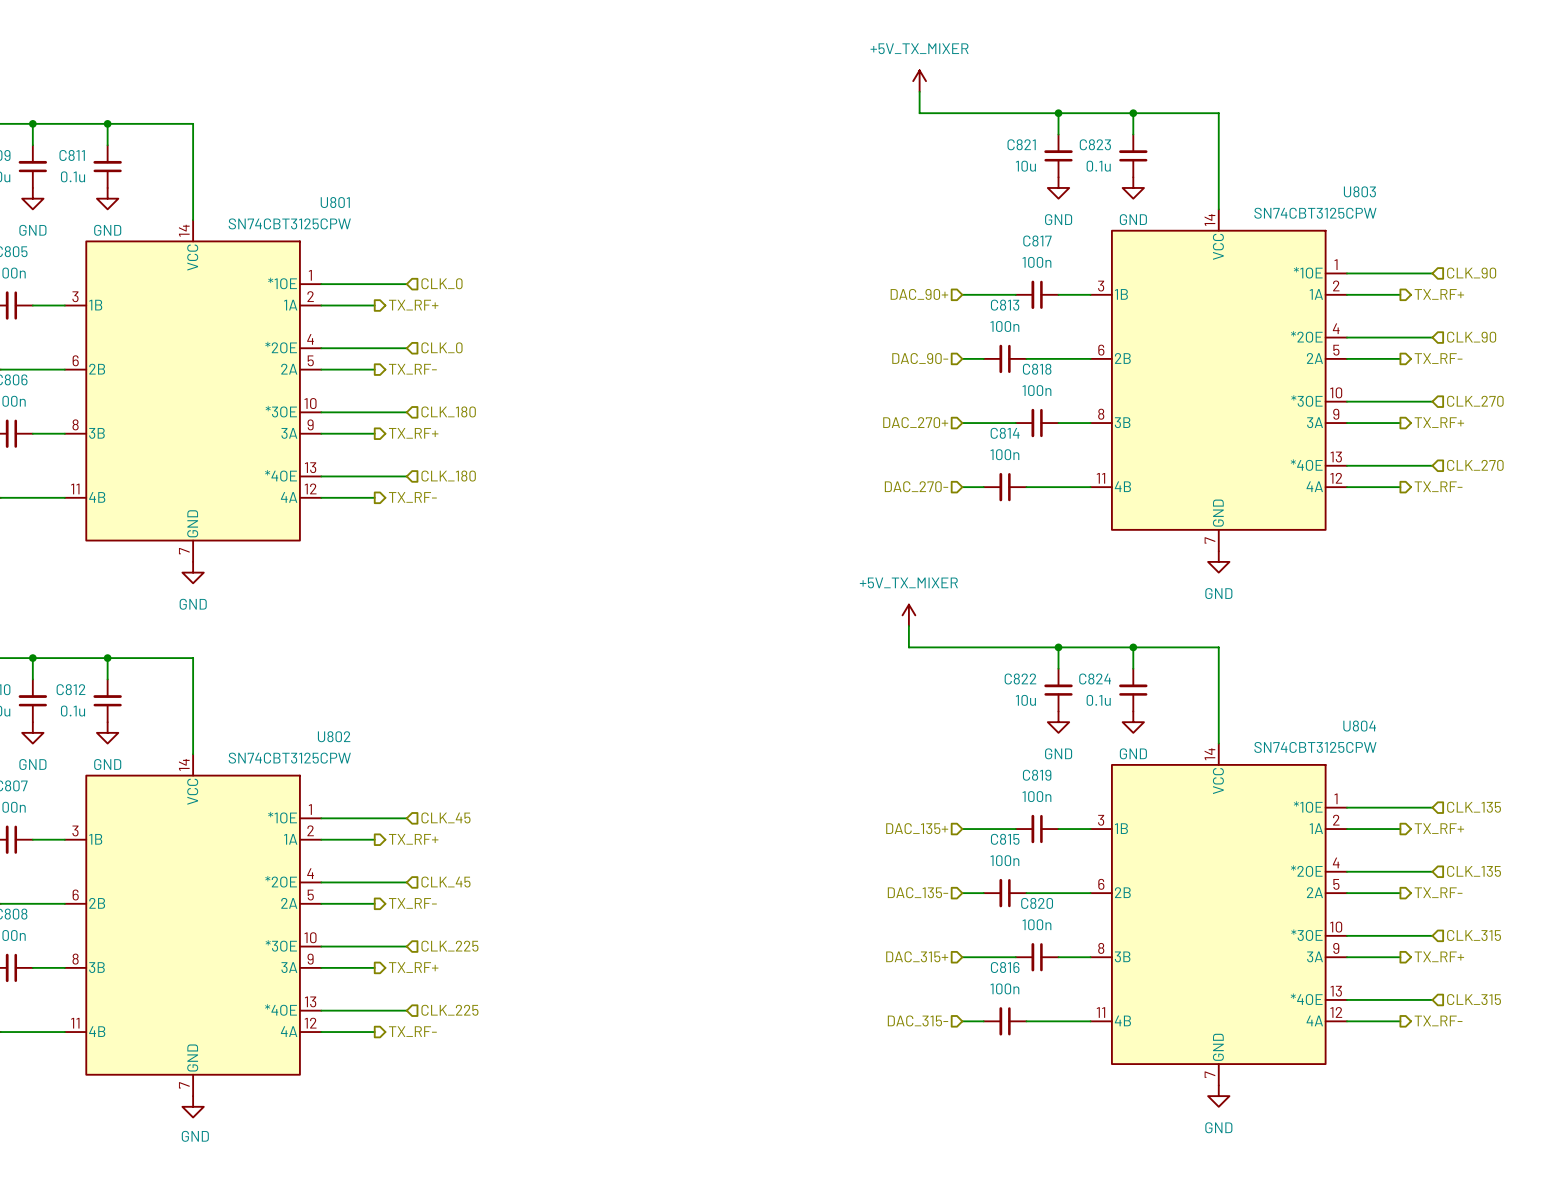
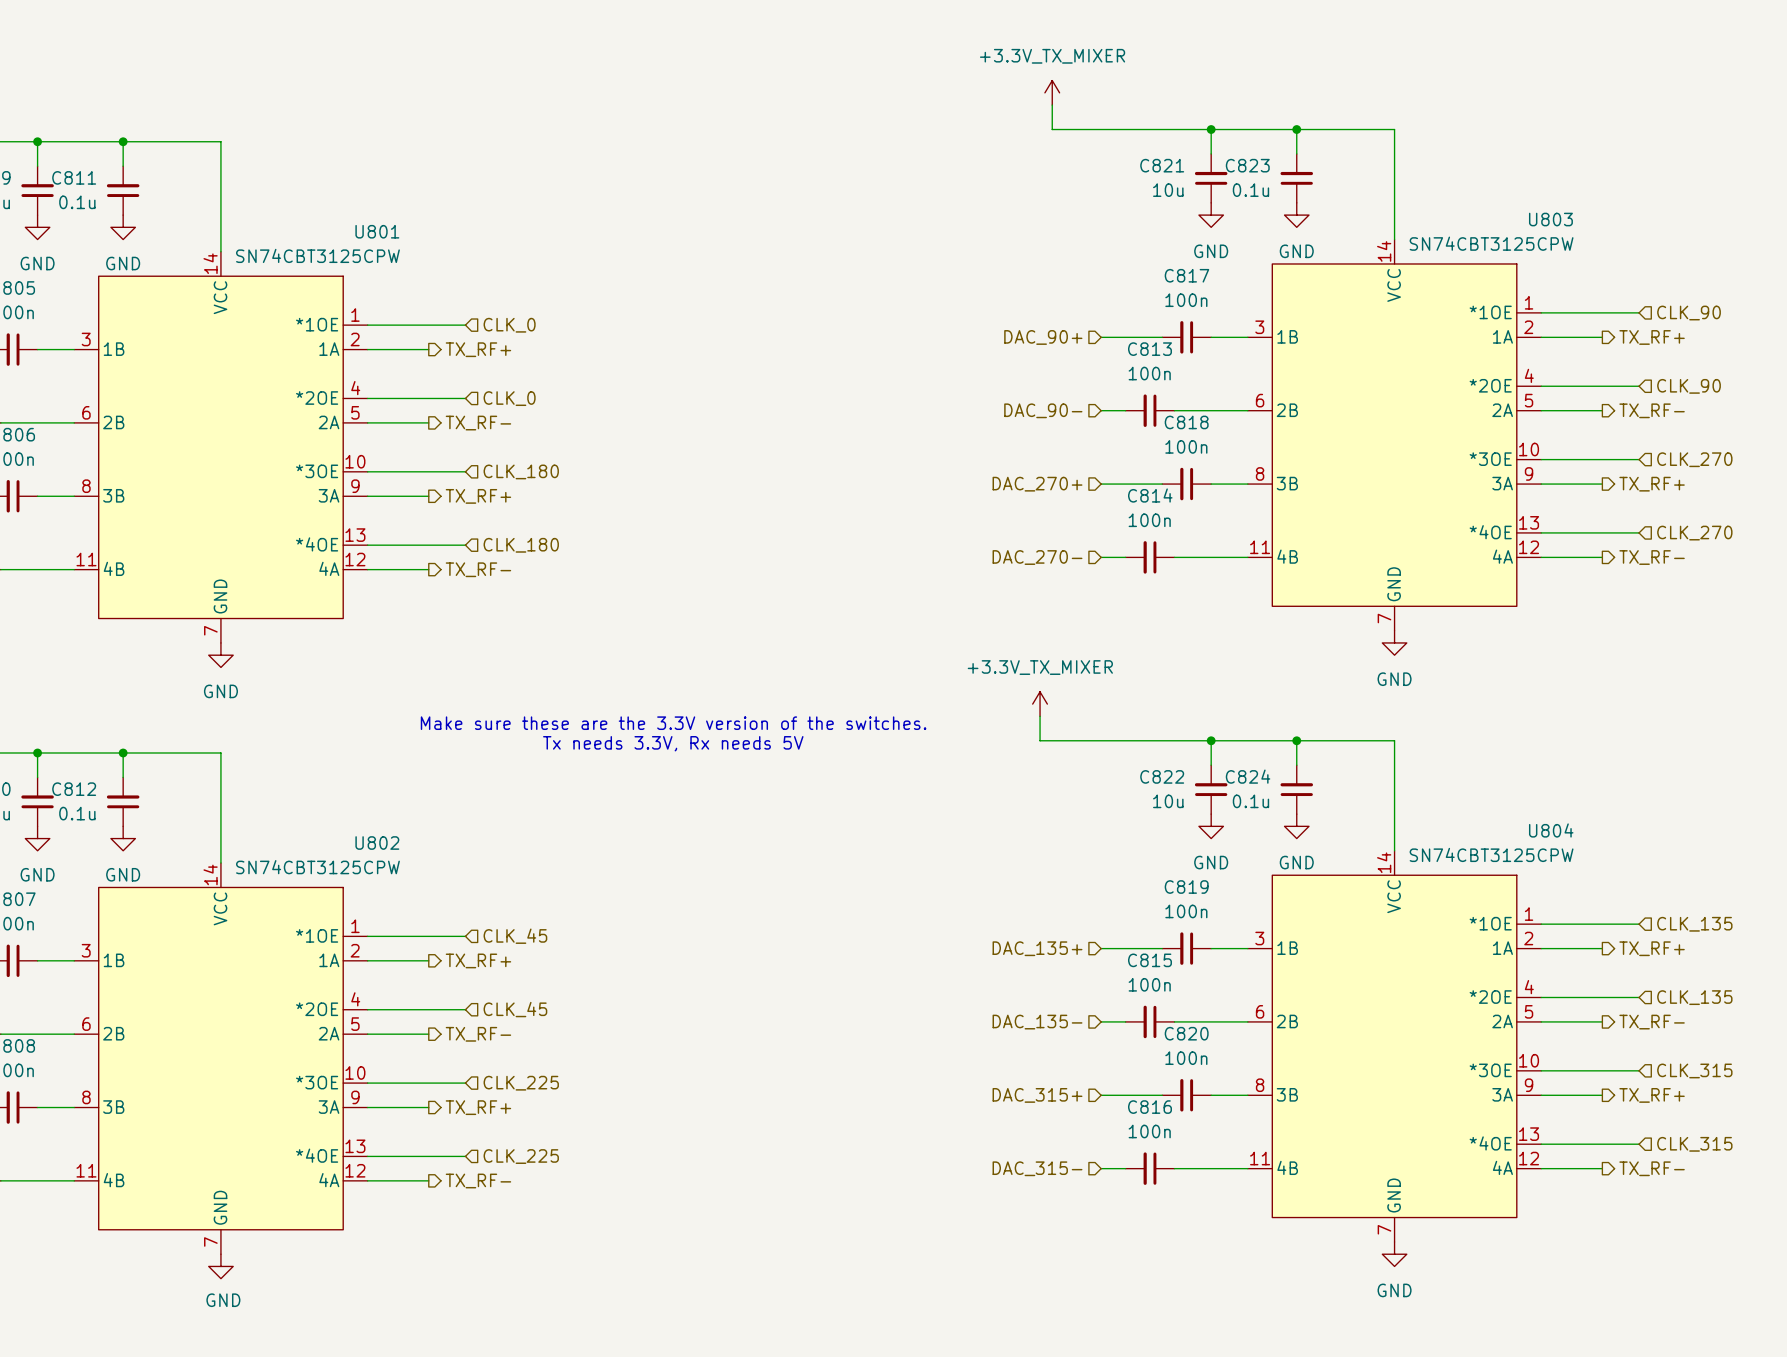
power symbol: +5V_TX_MIXER (919, 81) -> +3.3V_TX_MIXER (1052, 92)
power symbol: +5V_TX_MIXER (908, 615) -> +3.3V_TX_MIXER (1040, 704)
text: none -> Make sure these are the 3.3V version of the switches. (673, 723)
text: none -> Tx needs 3.3V, Rx needs 5V (673, 743)

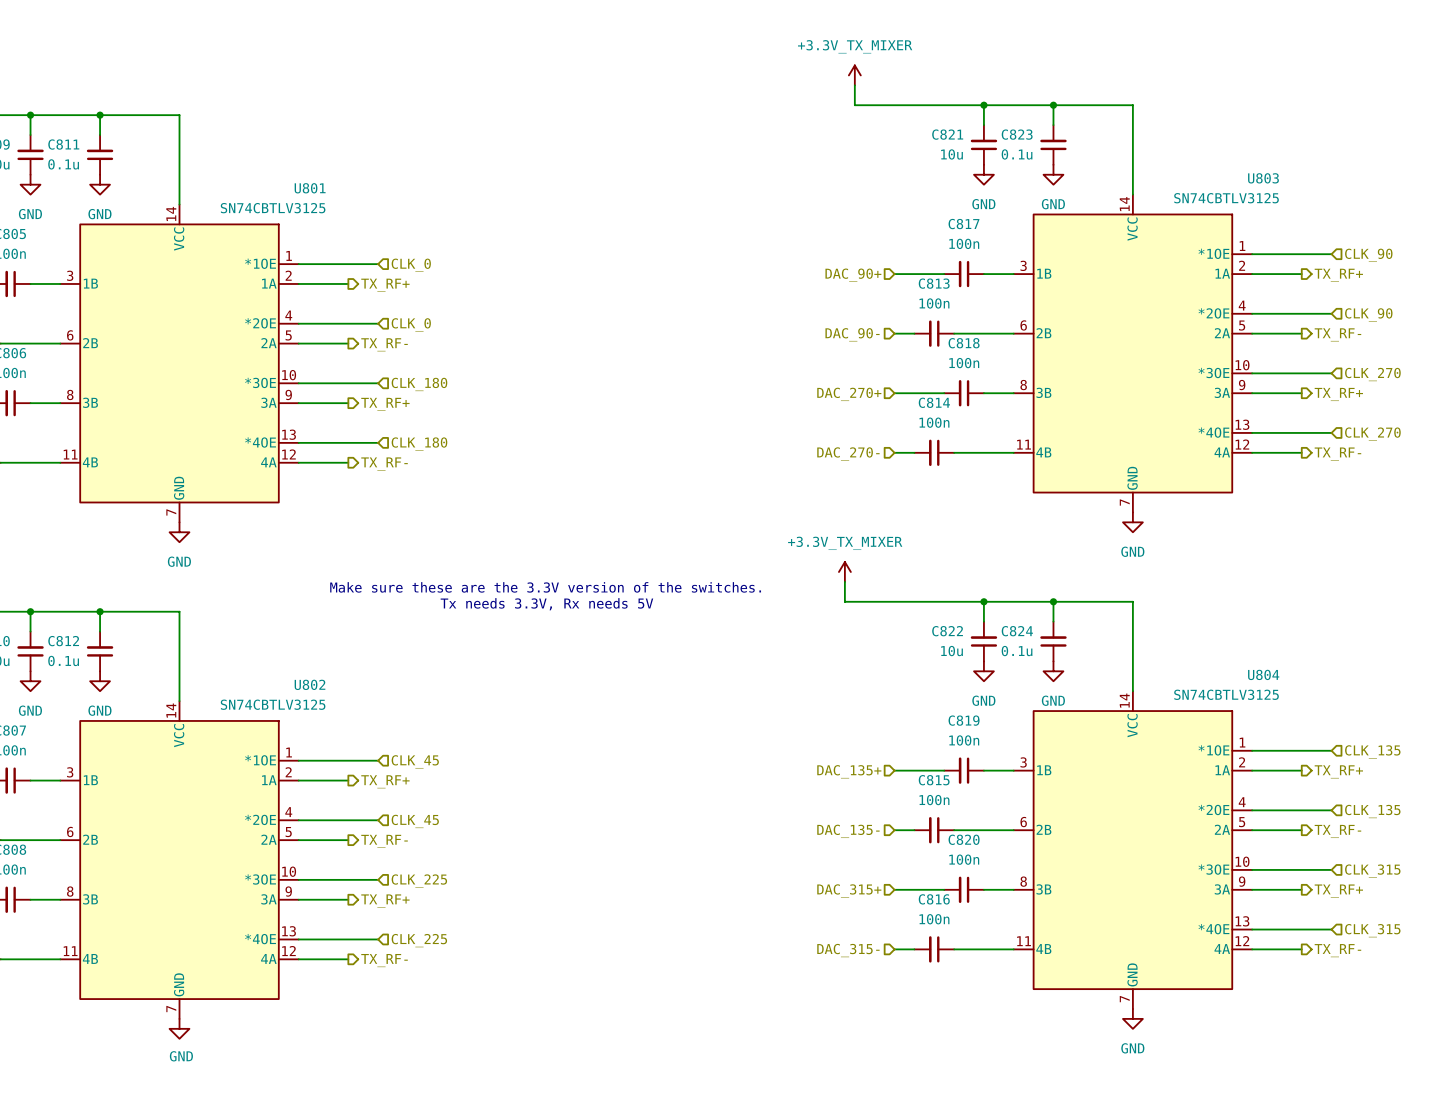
U803 value: SN74CBT3125CPW (1491, 243) -> SN74CBTLV3125 (1226, 198)
U801 value: SN74CBT3125CPW (317, 255) -> SN74CBTLV3125 (273, 208)
U804 value: SN74CBT3125CPW (1491, 854) -> SN74CBTLV3125 (1226, 694)
U802 value: SN74CBT3125CPW (317, 867) -> SN74CBTLV3125 (273, 704)

